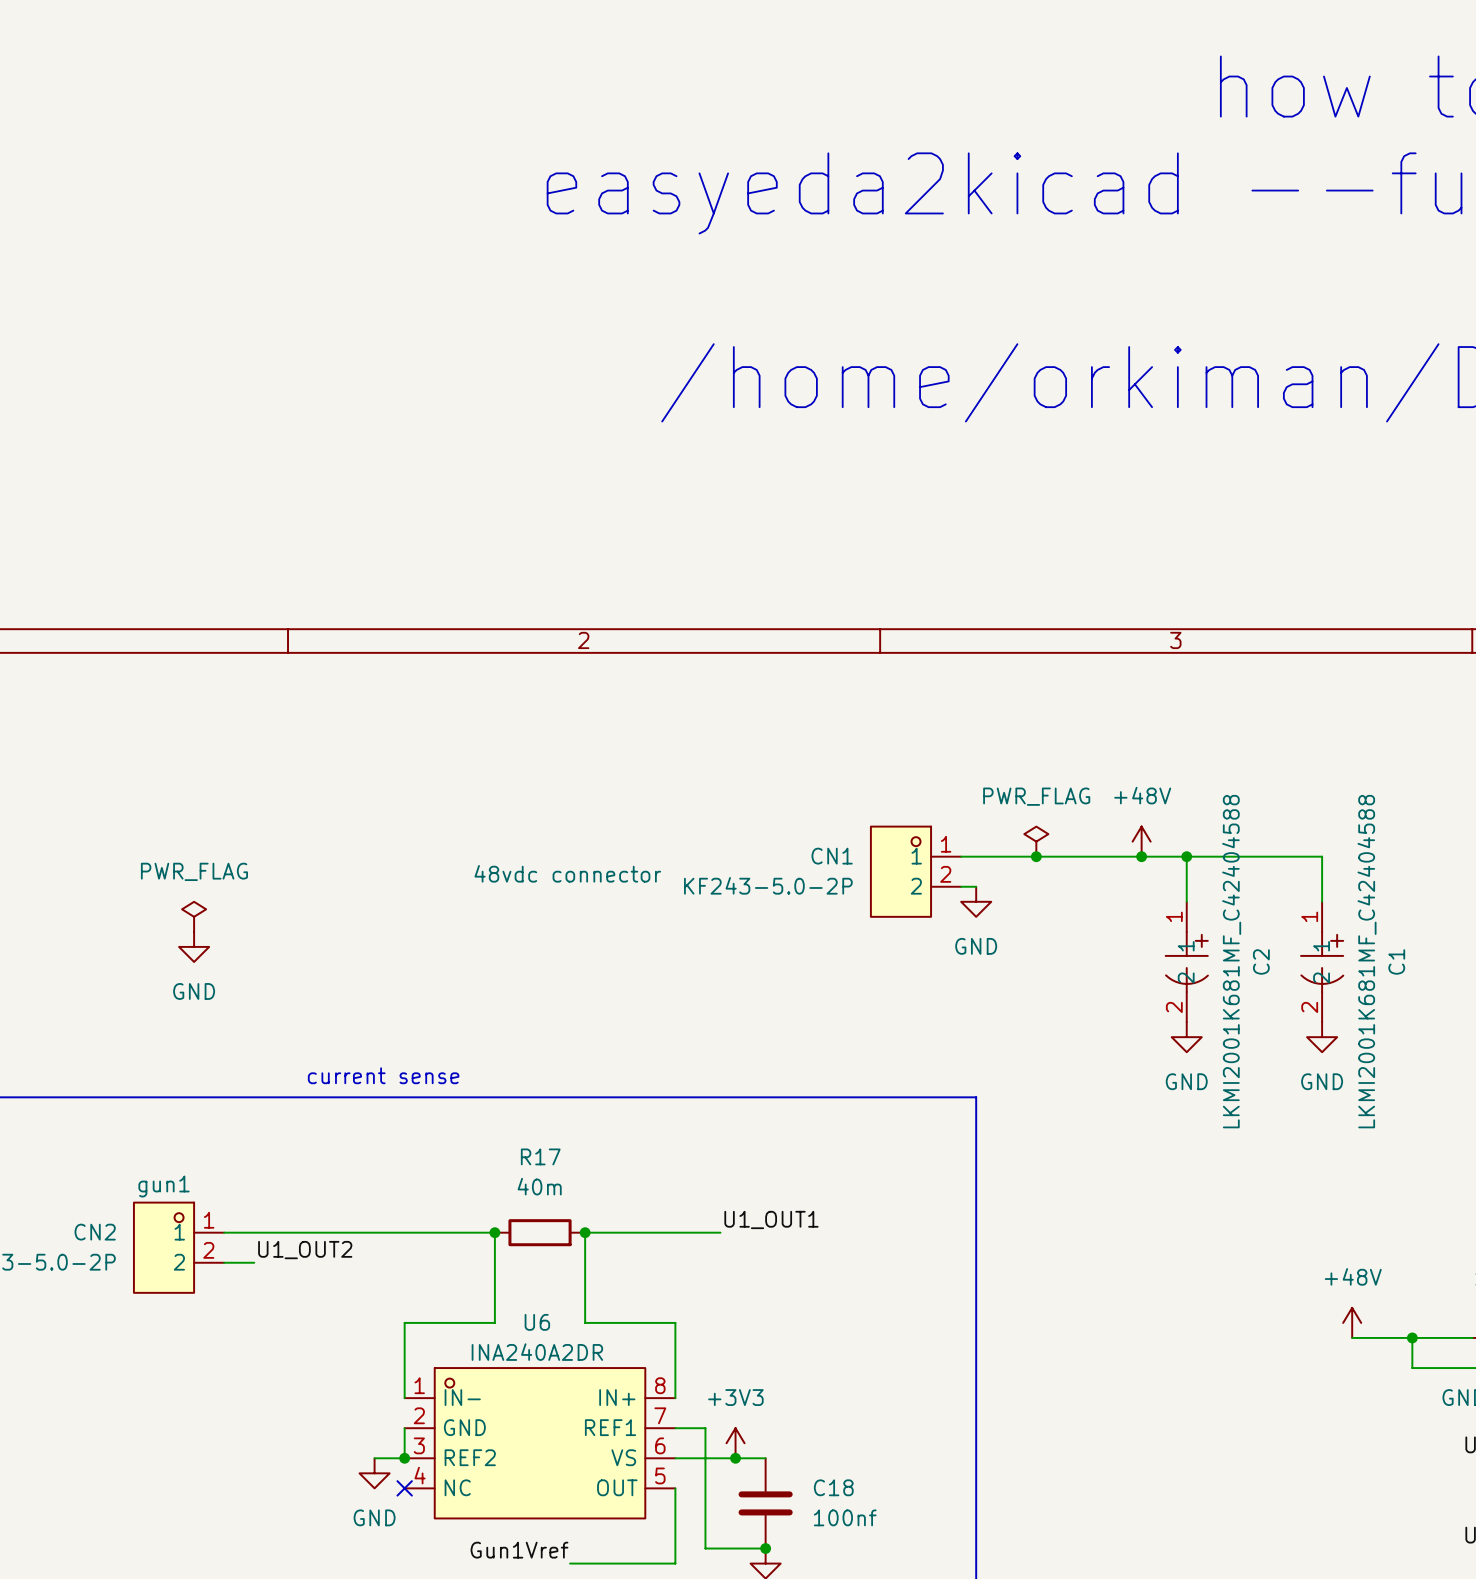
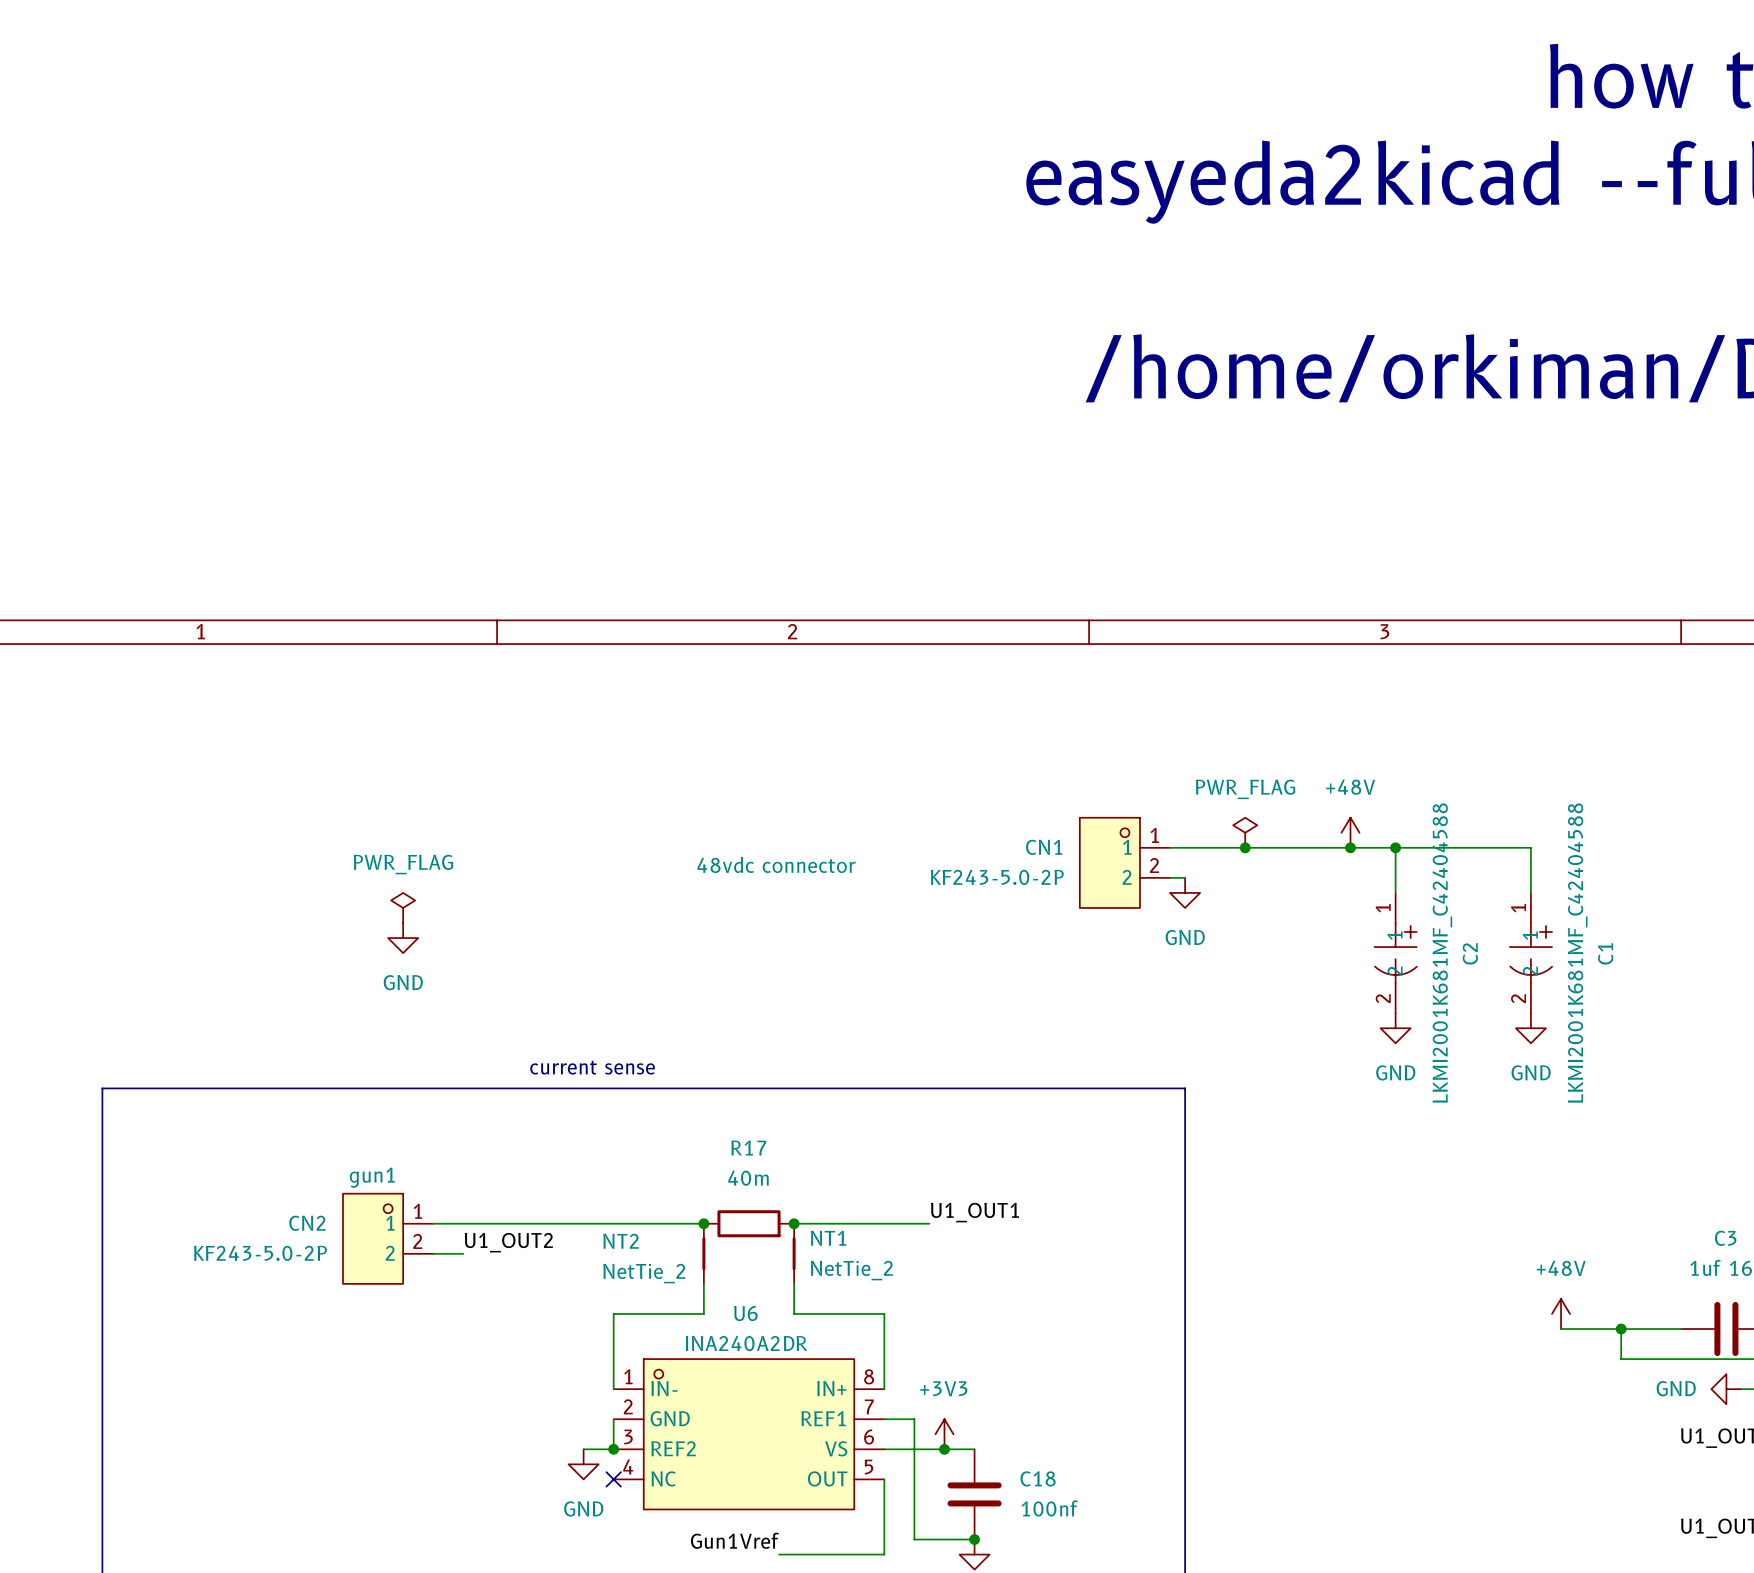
NT2: none -> NetTie_2 (703, 1253)
NT1: none -> NetTie_2 (794, 1253)

